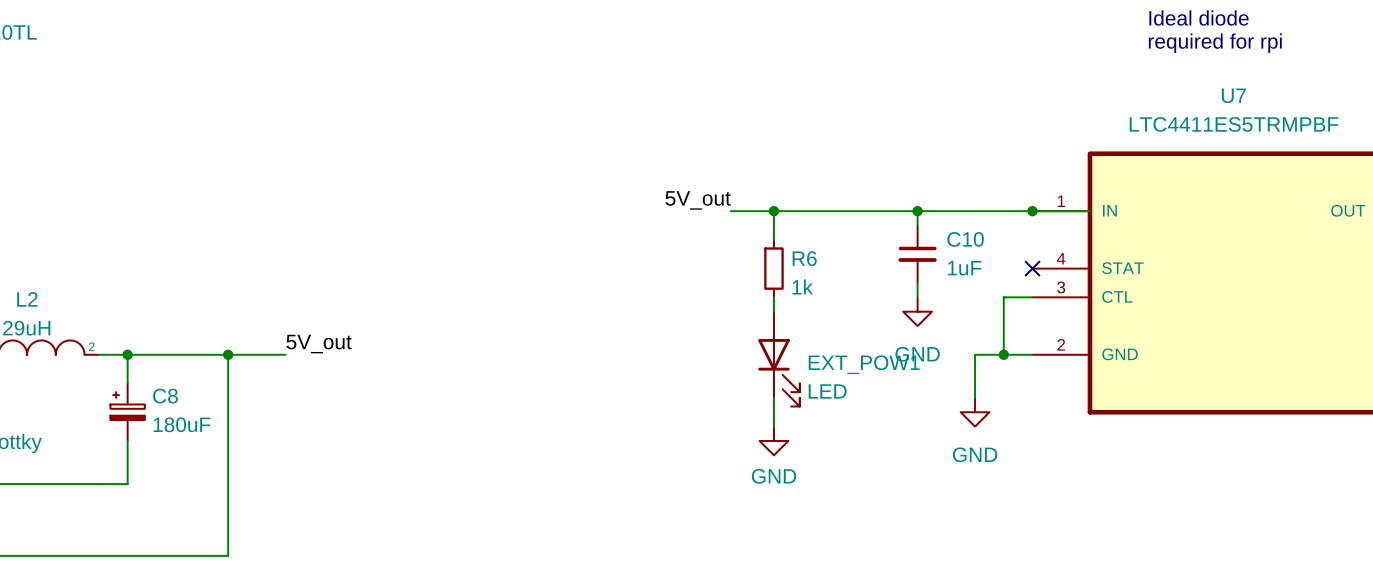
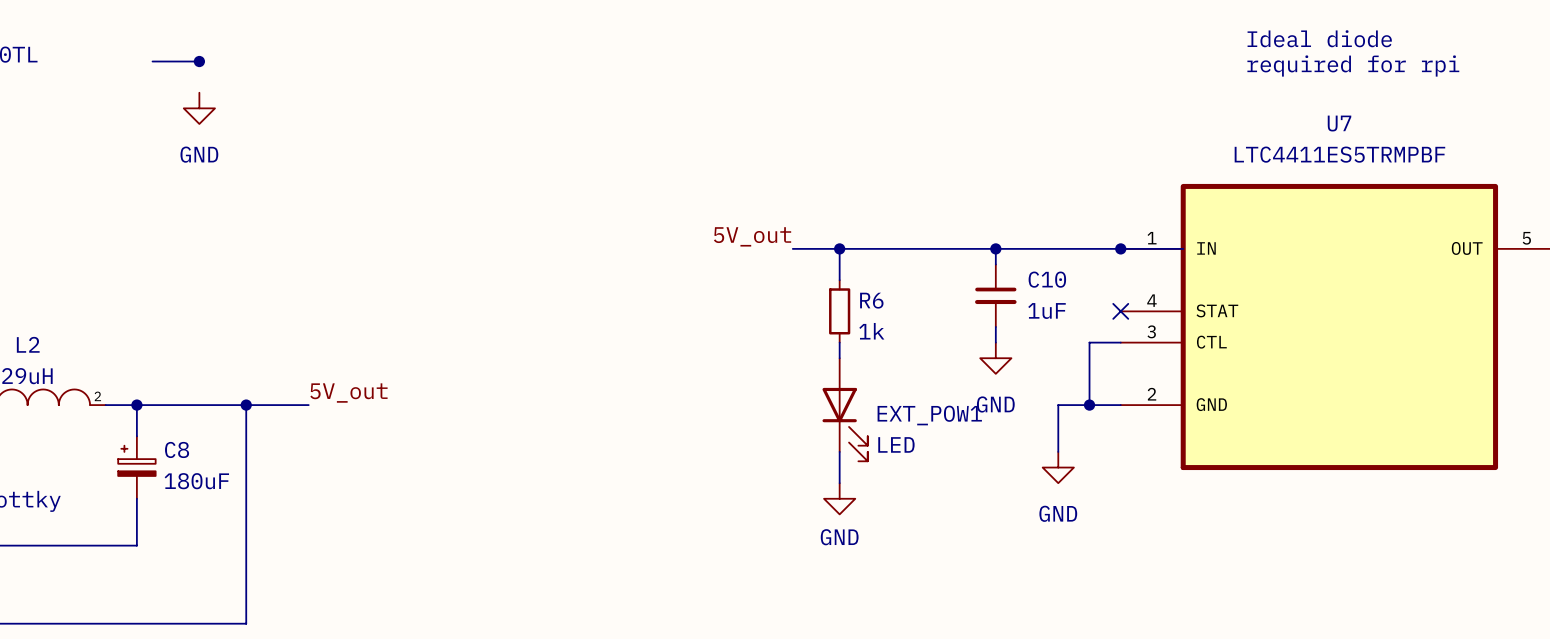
wire: none -> (152, 61) (199, 61)
junction: none -> (199, 61)
power symbol: none -> GND (199, 108)

